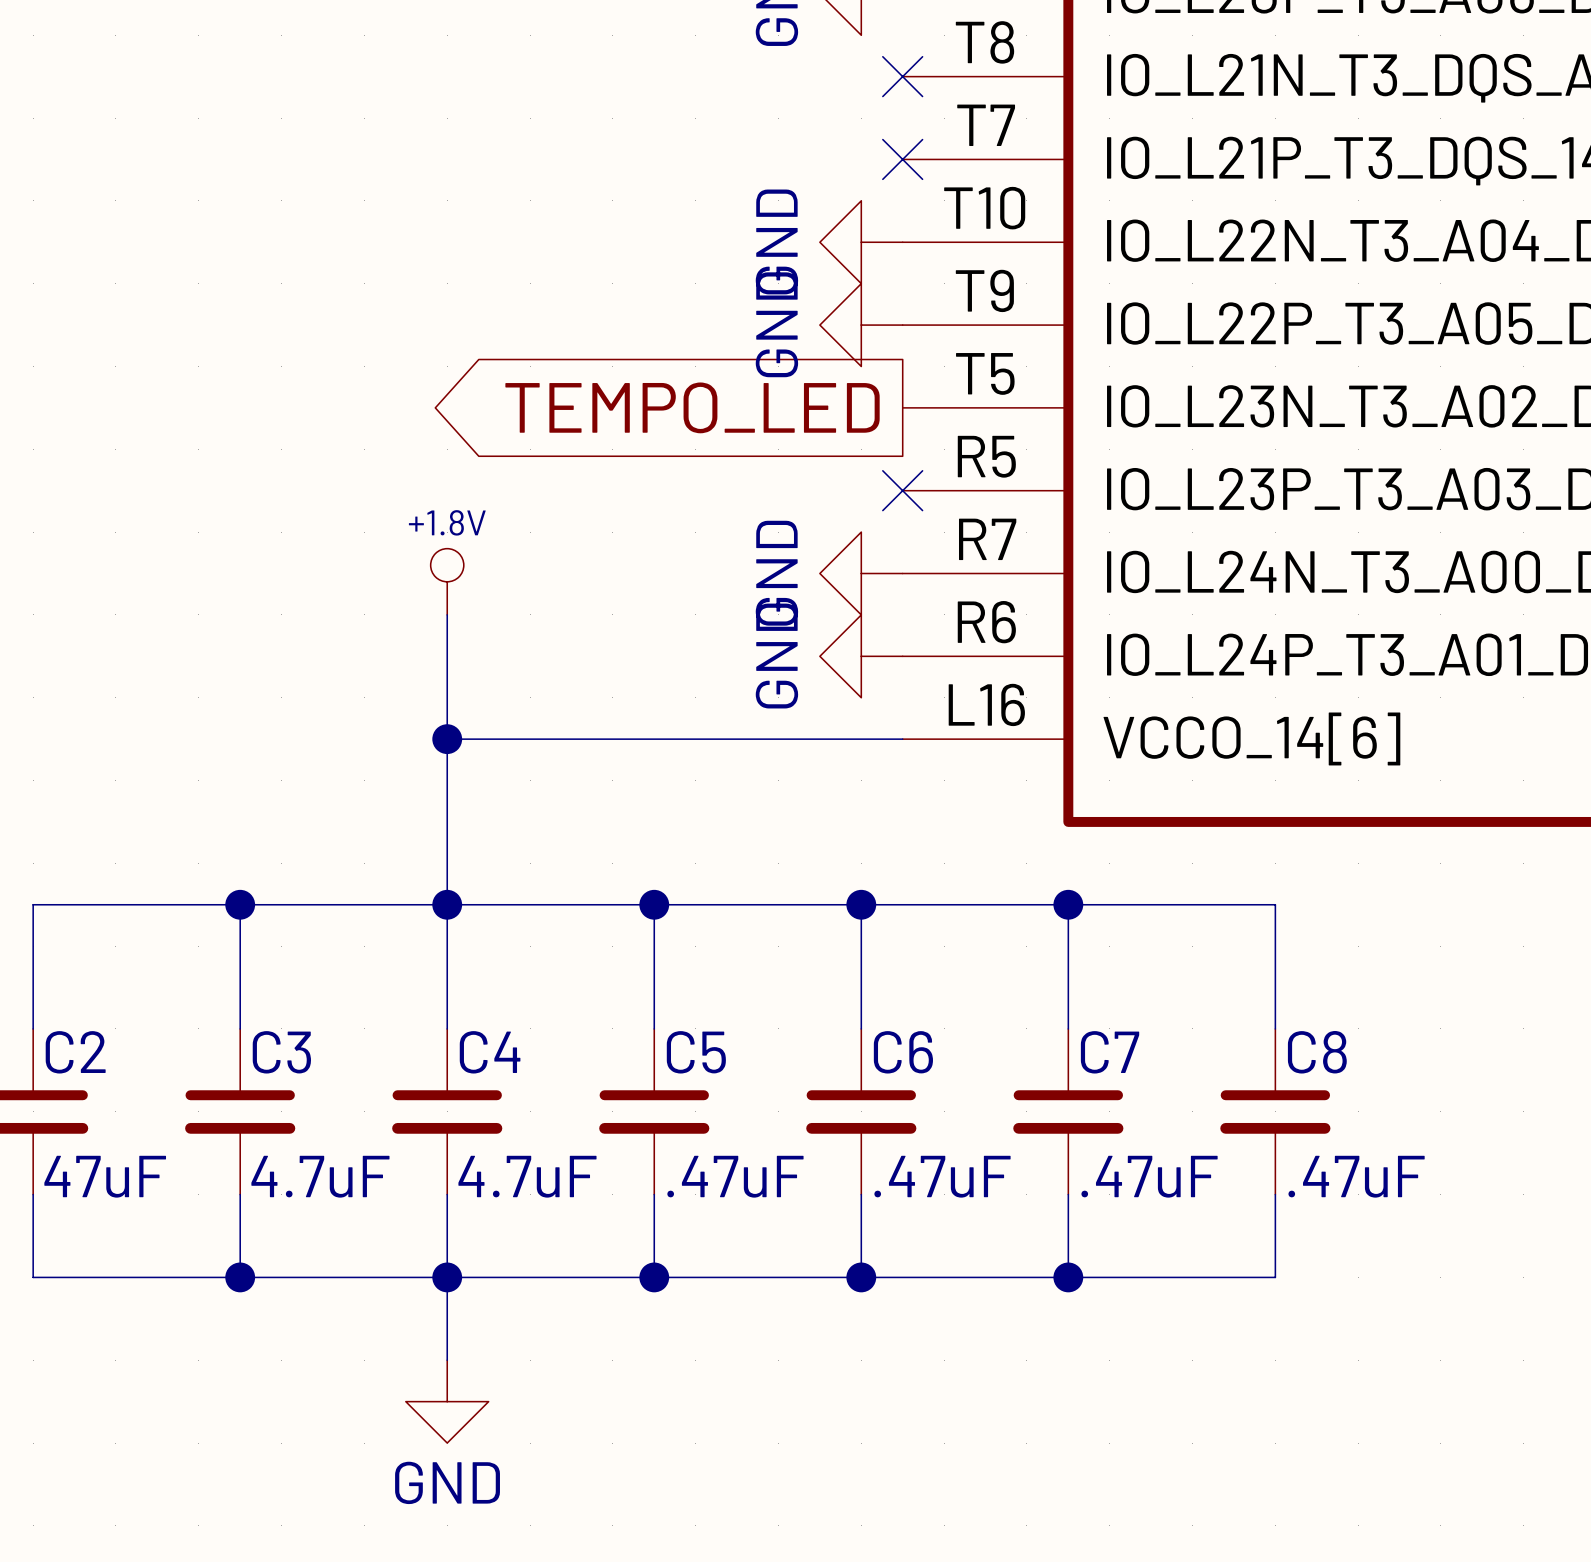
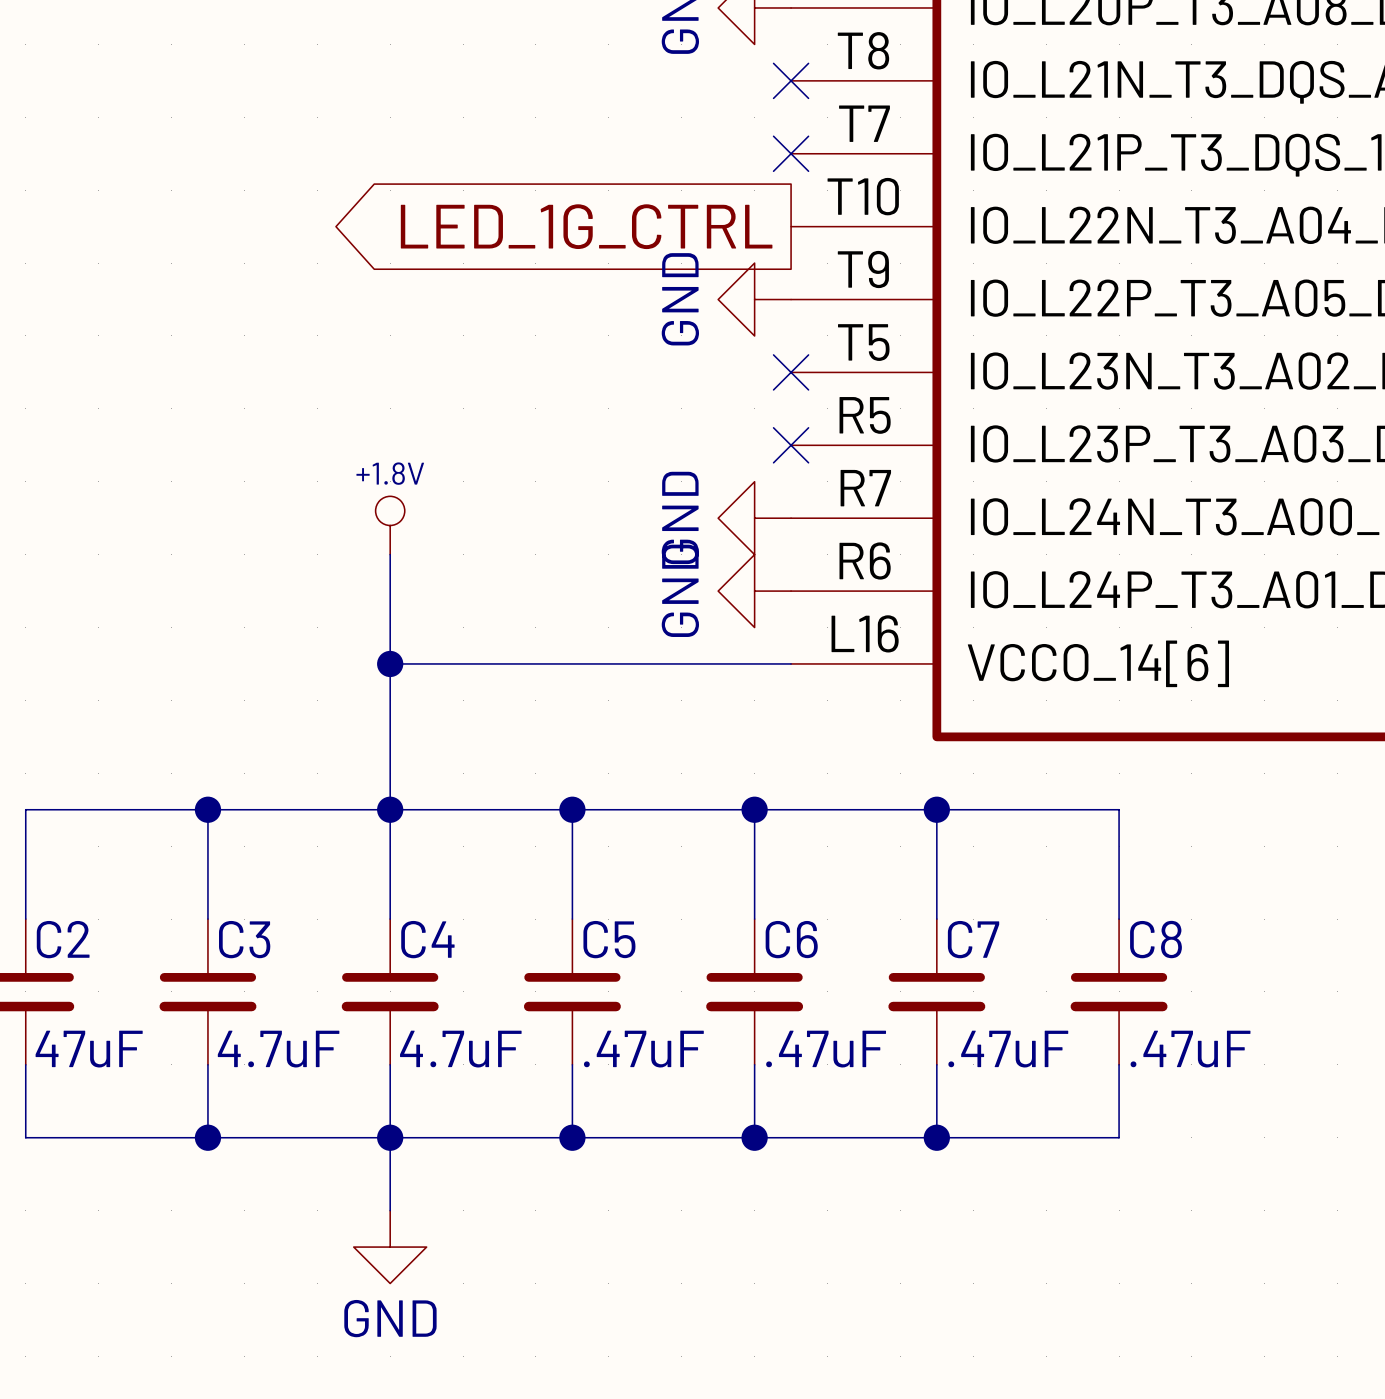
global label: none -> LED_1G_CTRL (586, 226)
power symbol: GND (861, 242) -> none
global label: TEMPO_LED (692, 407) -> none
no-connect mark: none -> (791, 372)

